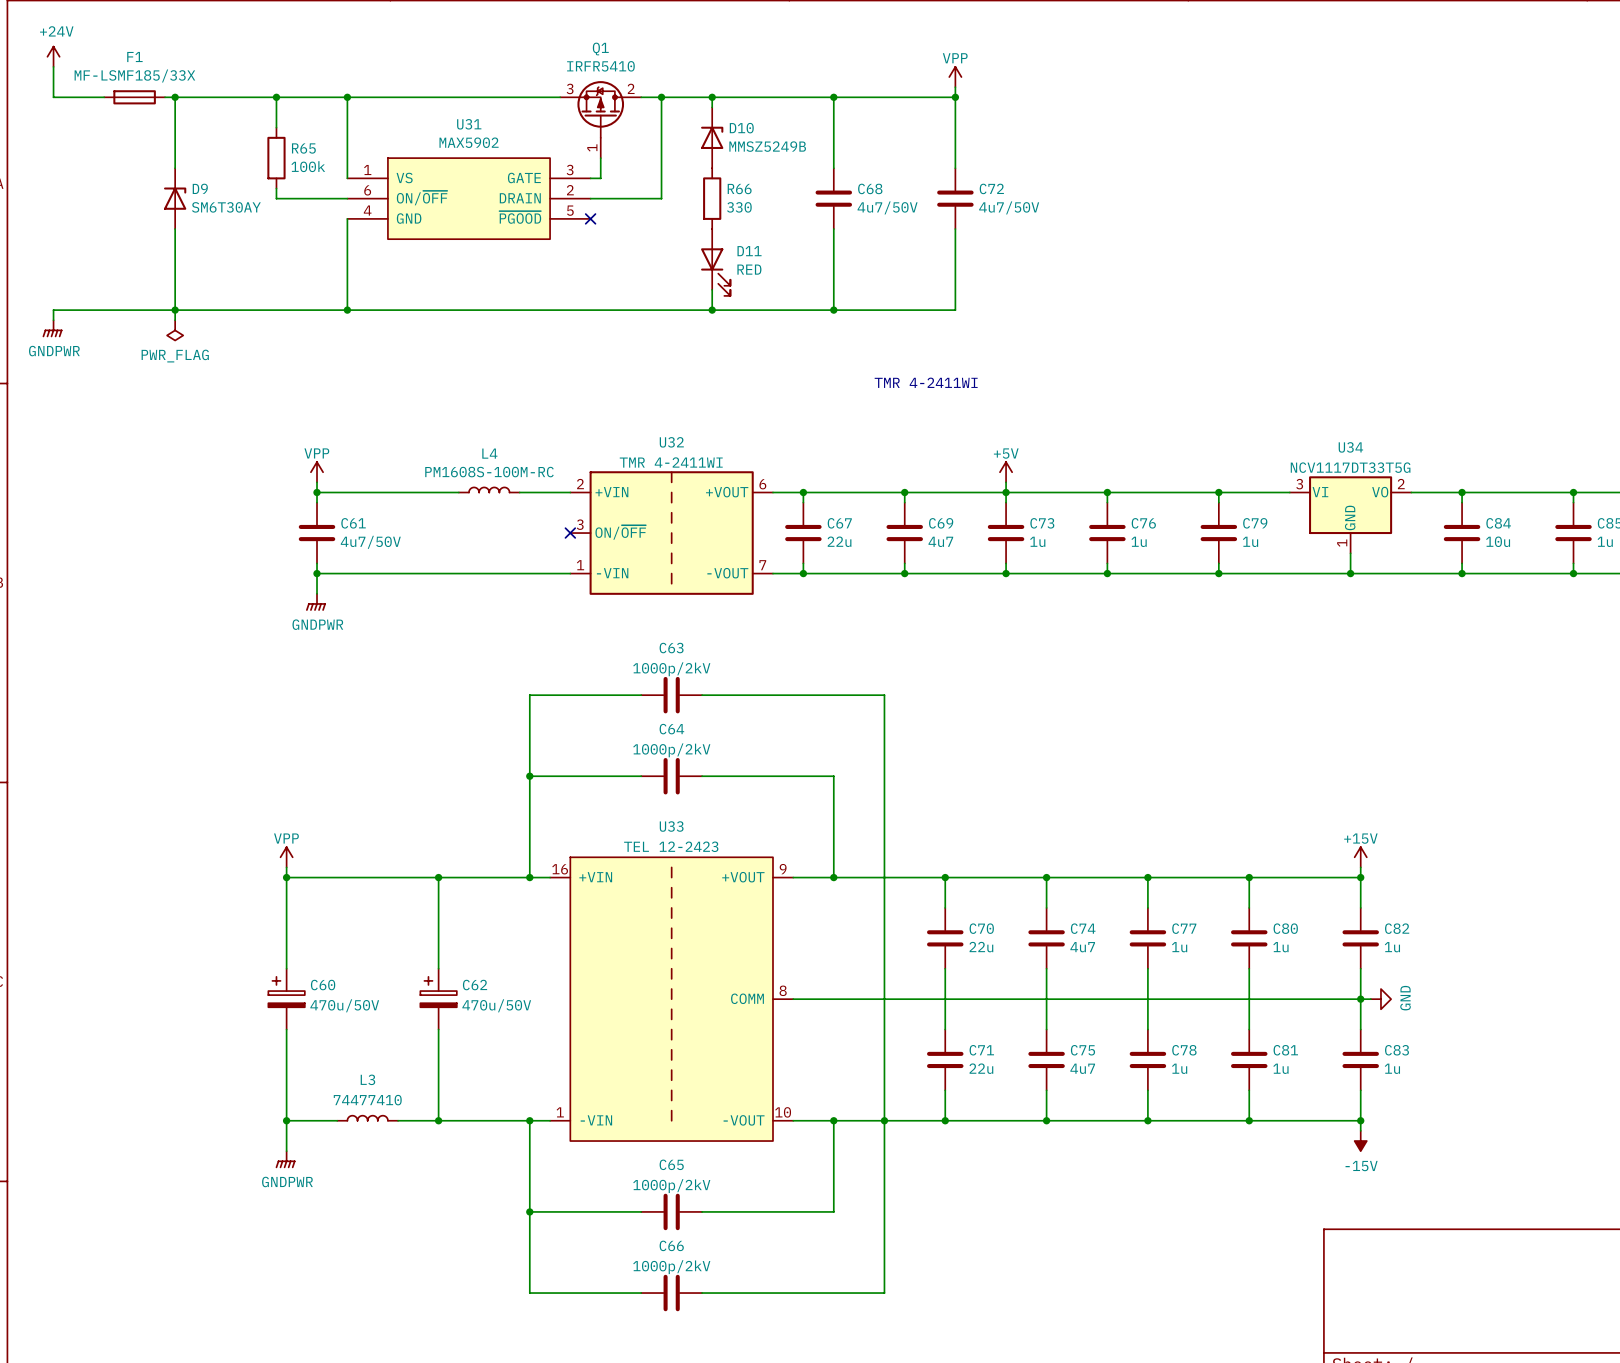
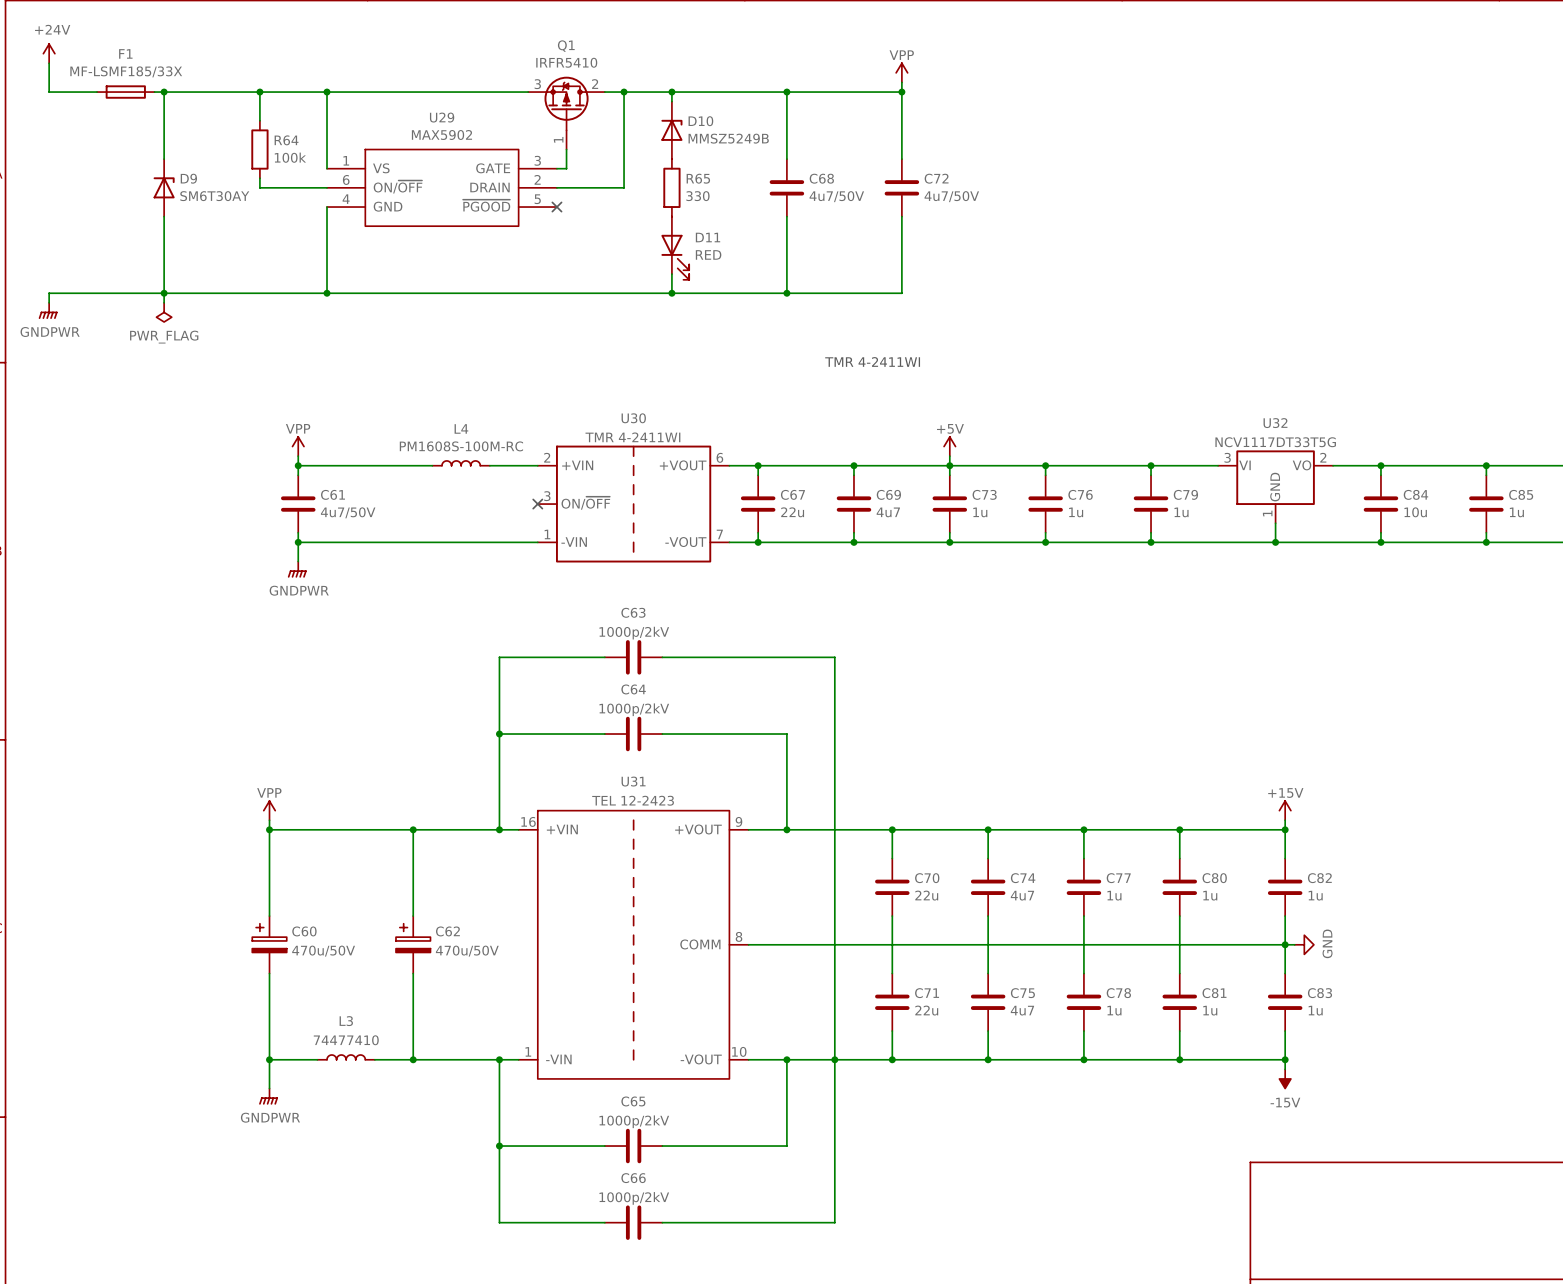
U31 name: U31 (469, 124) -> U29 (442, 117)
R65 name: R65 (303, 148) -> R64 (286, 140)
R66 name: R66 (739, 189) -> R65 (698, 178)
U32 name: U32 (671, 442) -> U30 (633, 418)
U34 name: U34 (1350, 447) -> U32 (1275, 423)
U33 name: U33 (671, 826) -> U31 (633, 781)

